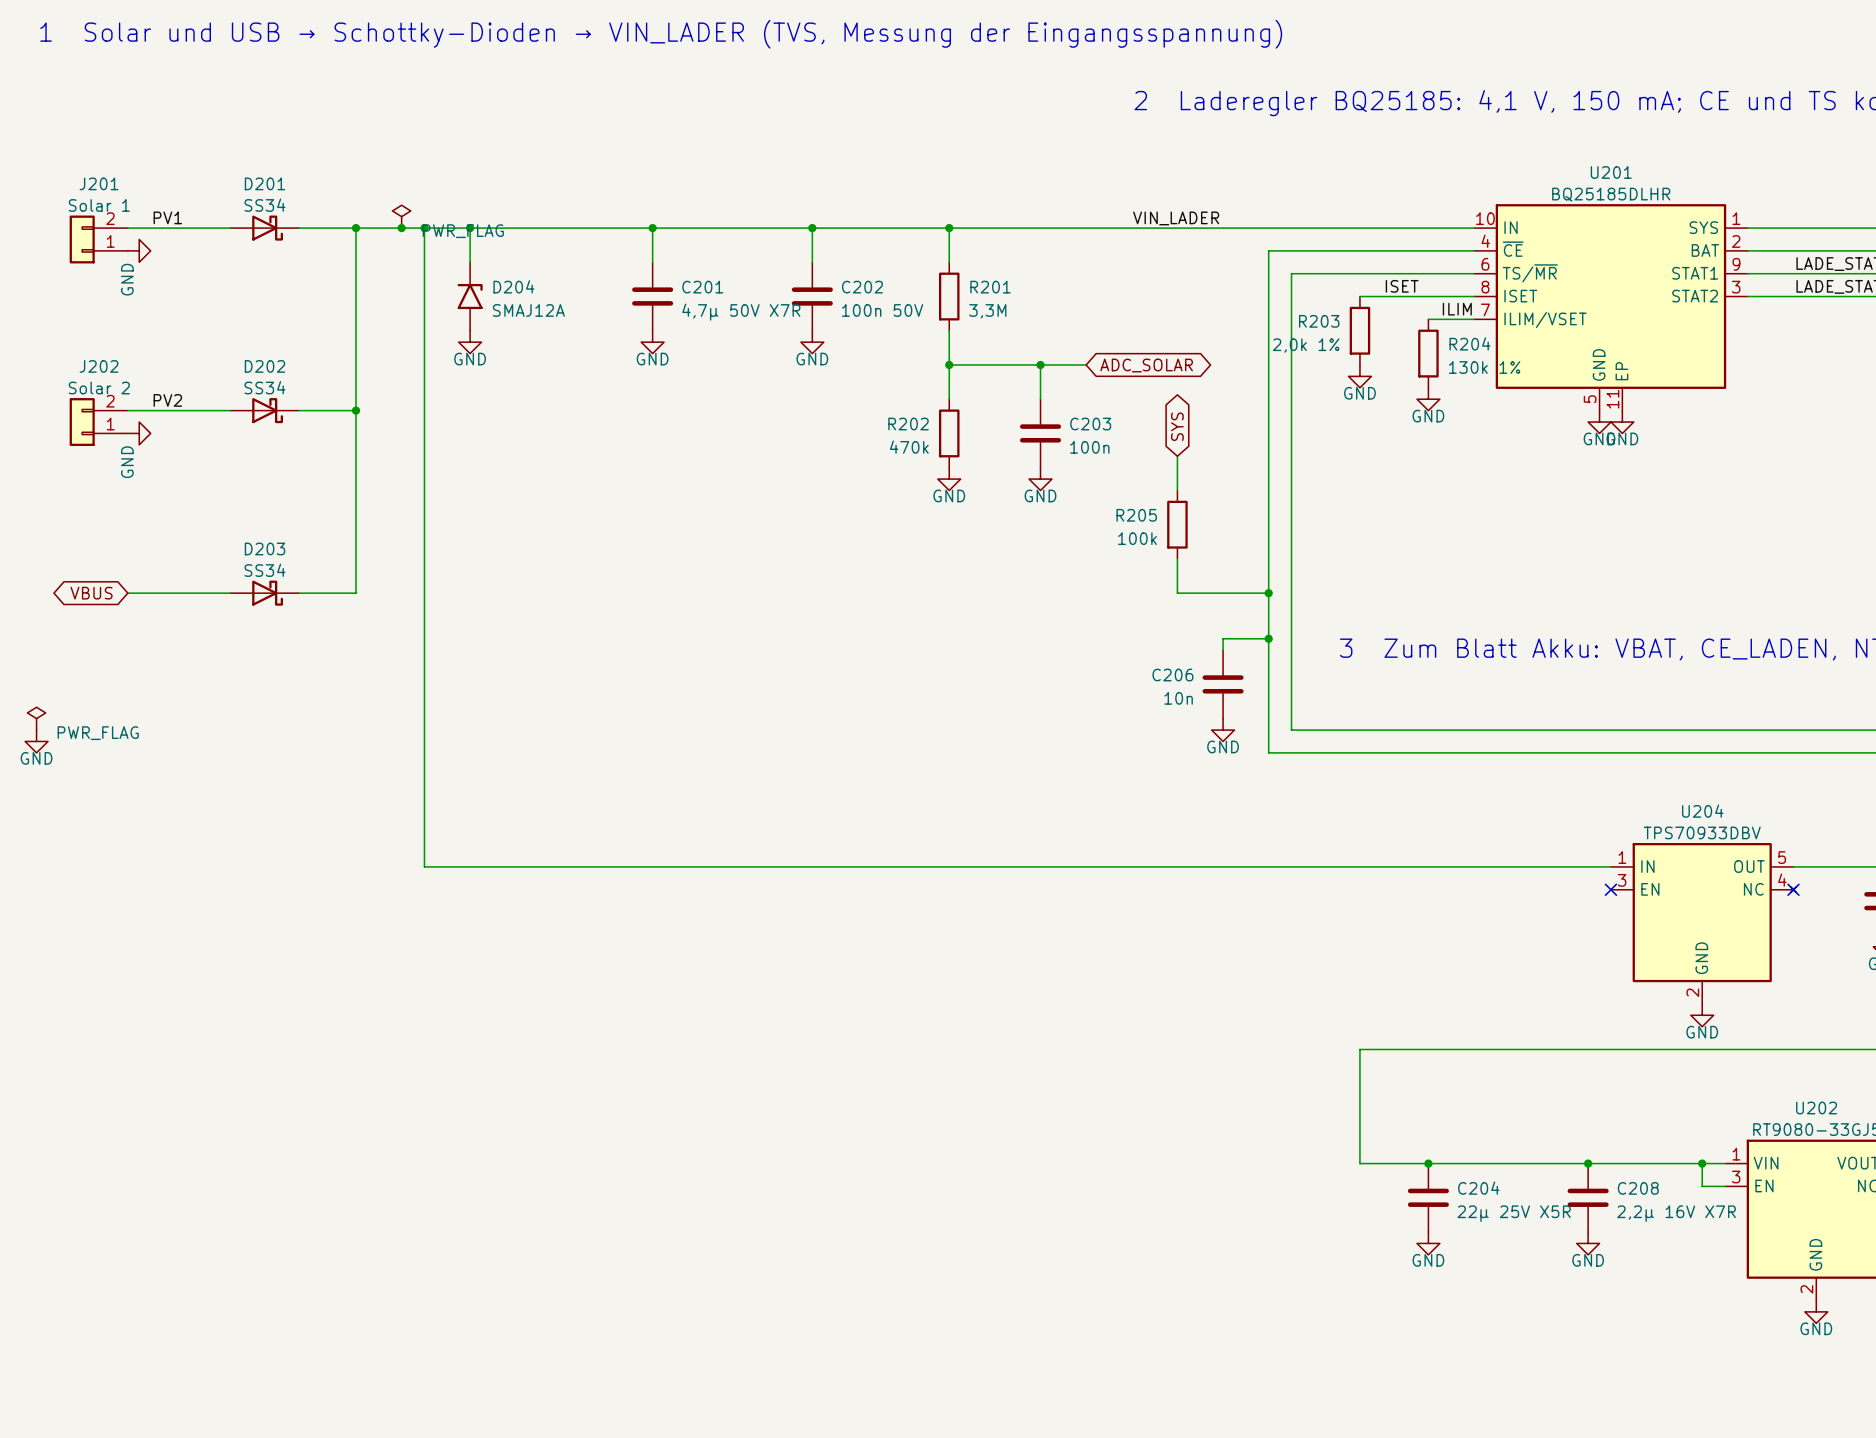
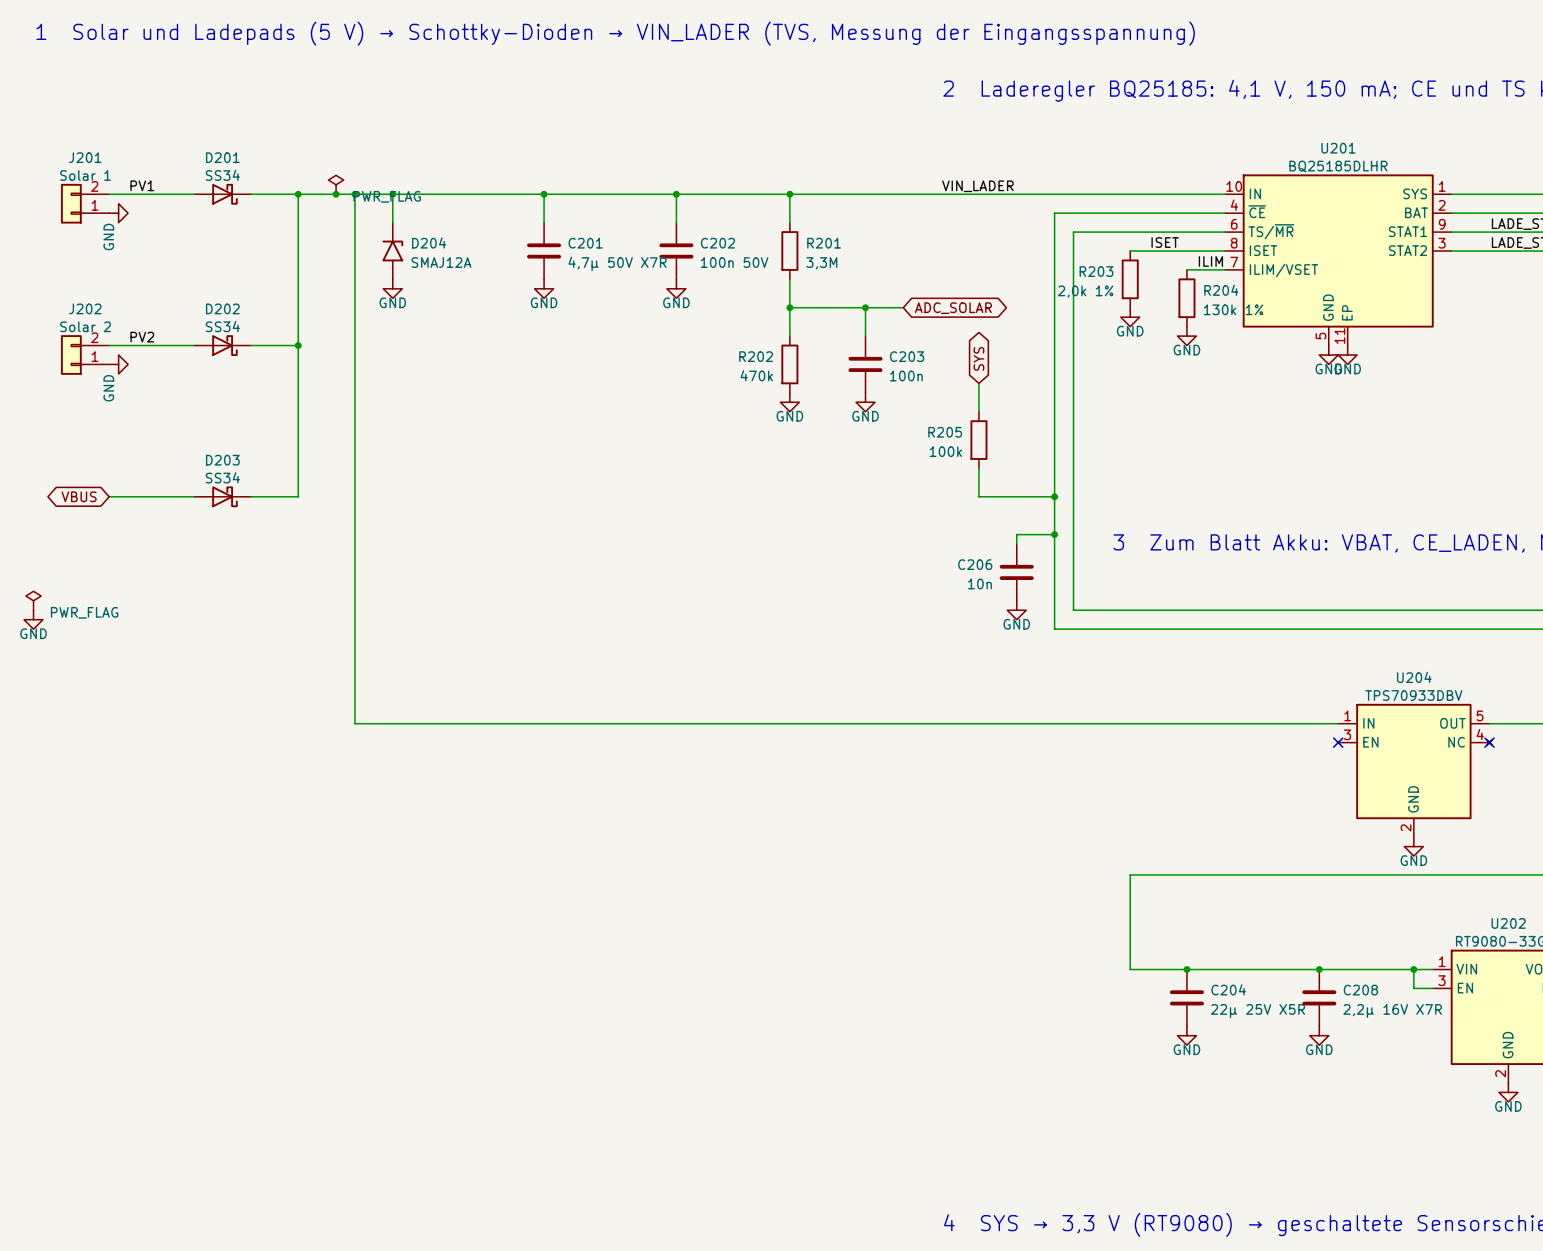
text: 1 Solar und USB → Schottky-Dioden → VIN_LADER (TVS, Messung der Eingangsspannung) (661, 34) -> 1 Solar und Ladepads (5 V) → Schottky-Dioden → VIN_LADER (TVS, Messung der Eingangsspannung) (615, 33)

